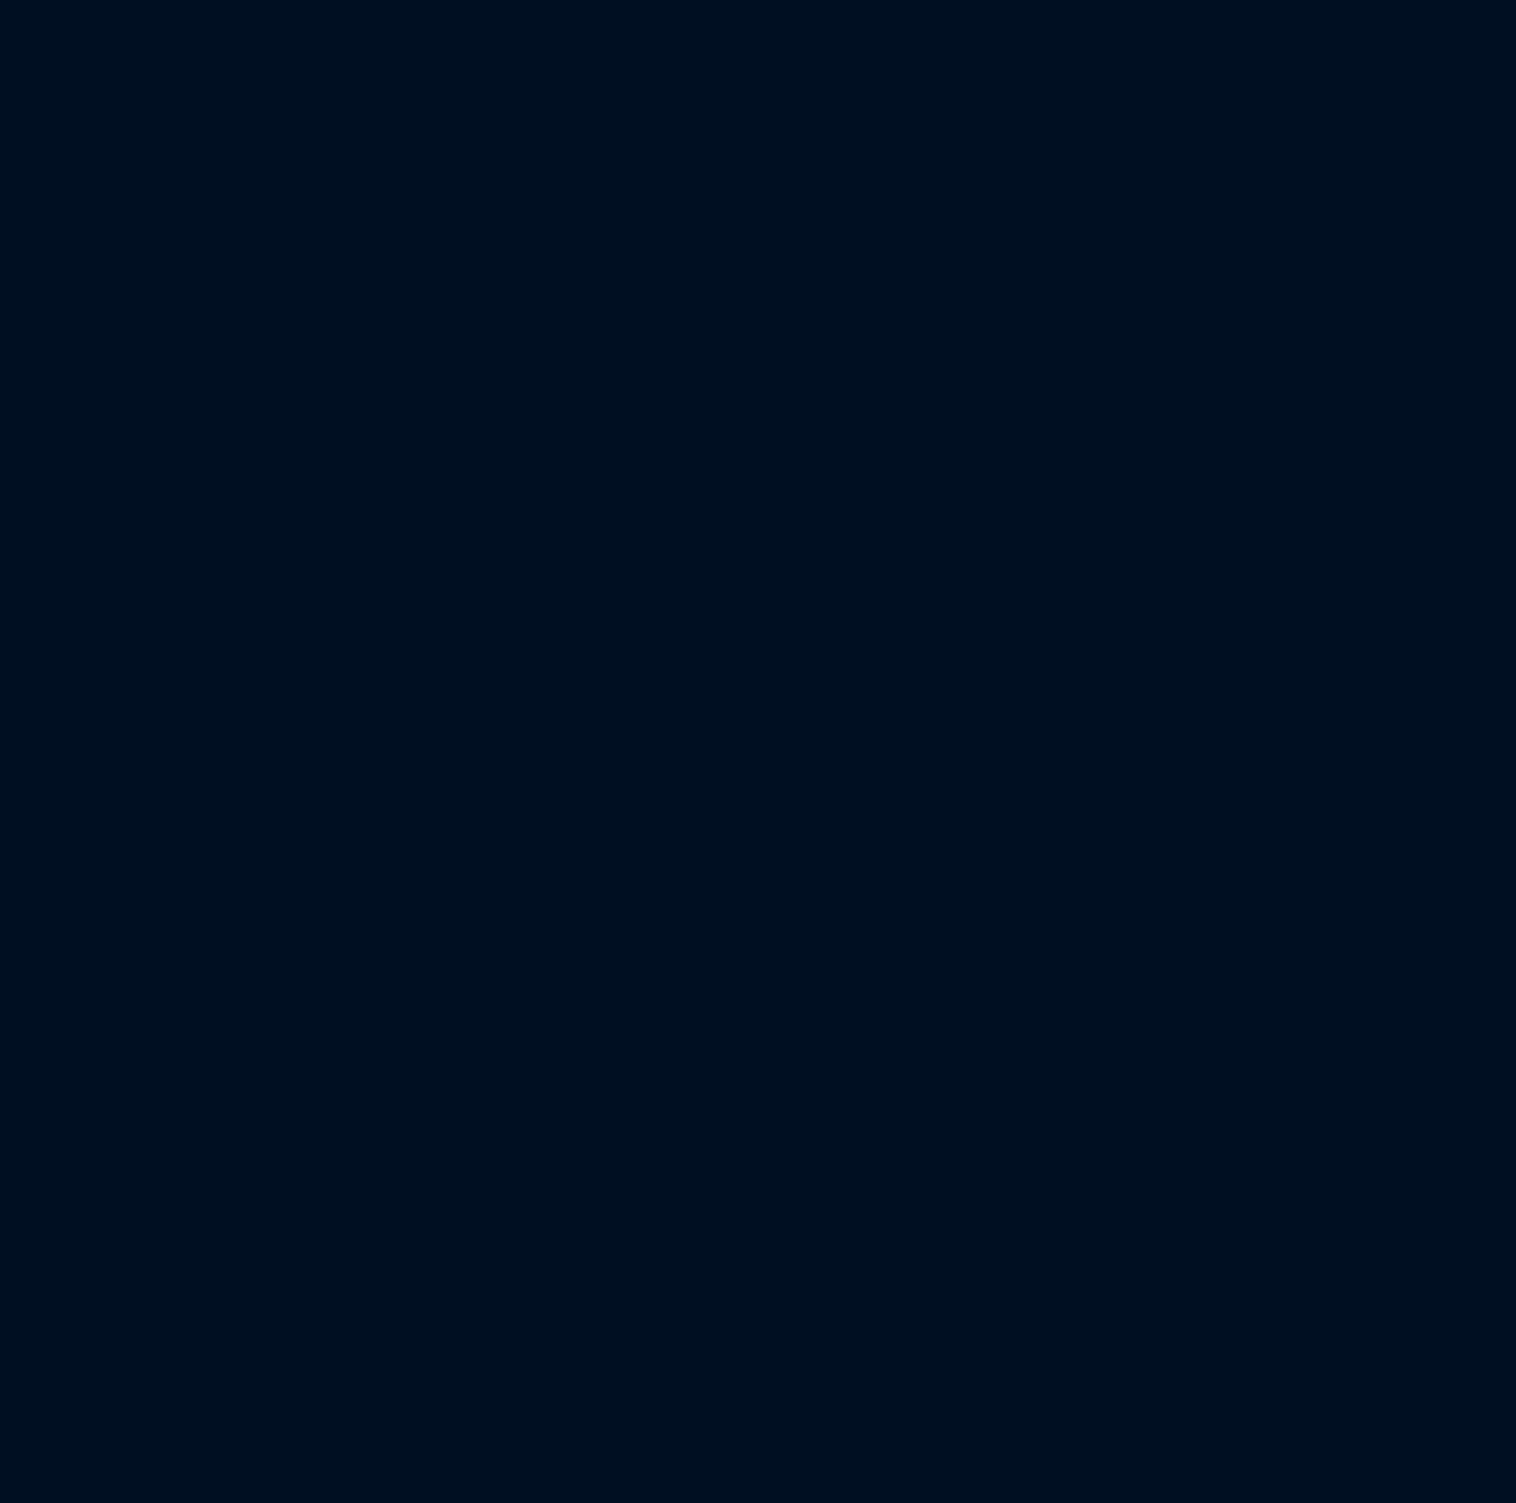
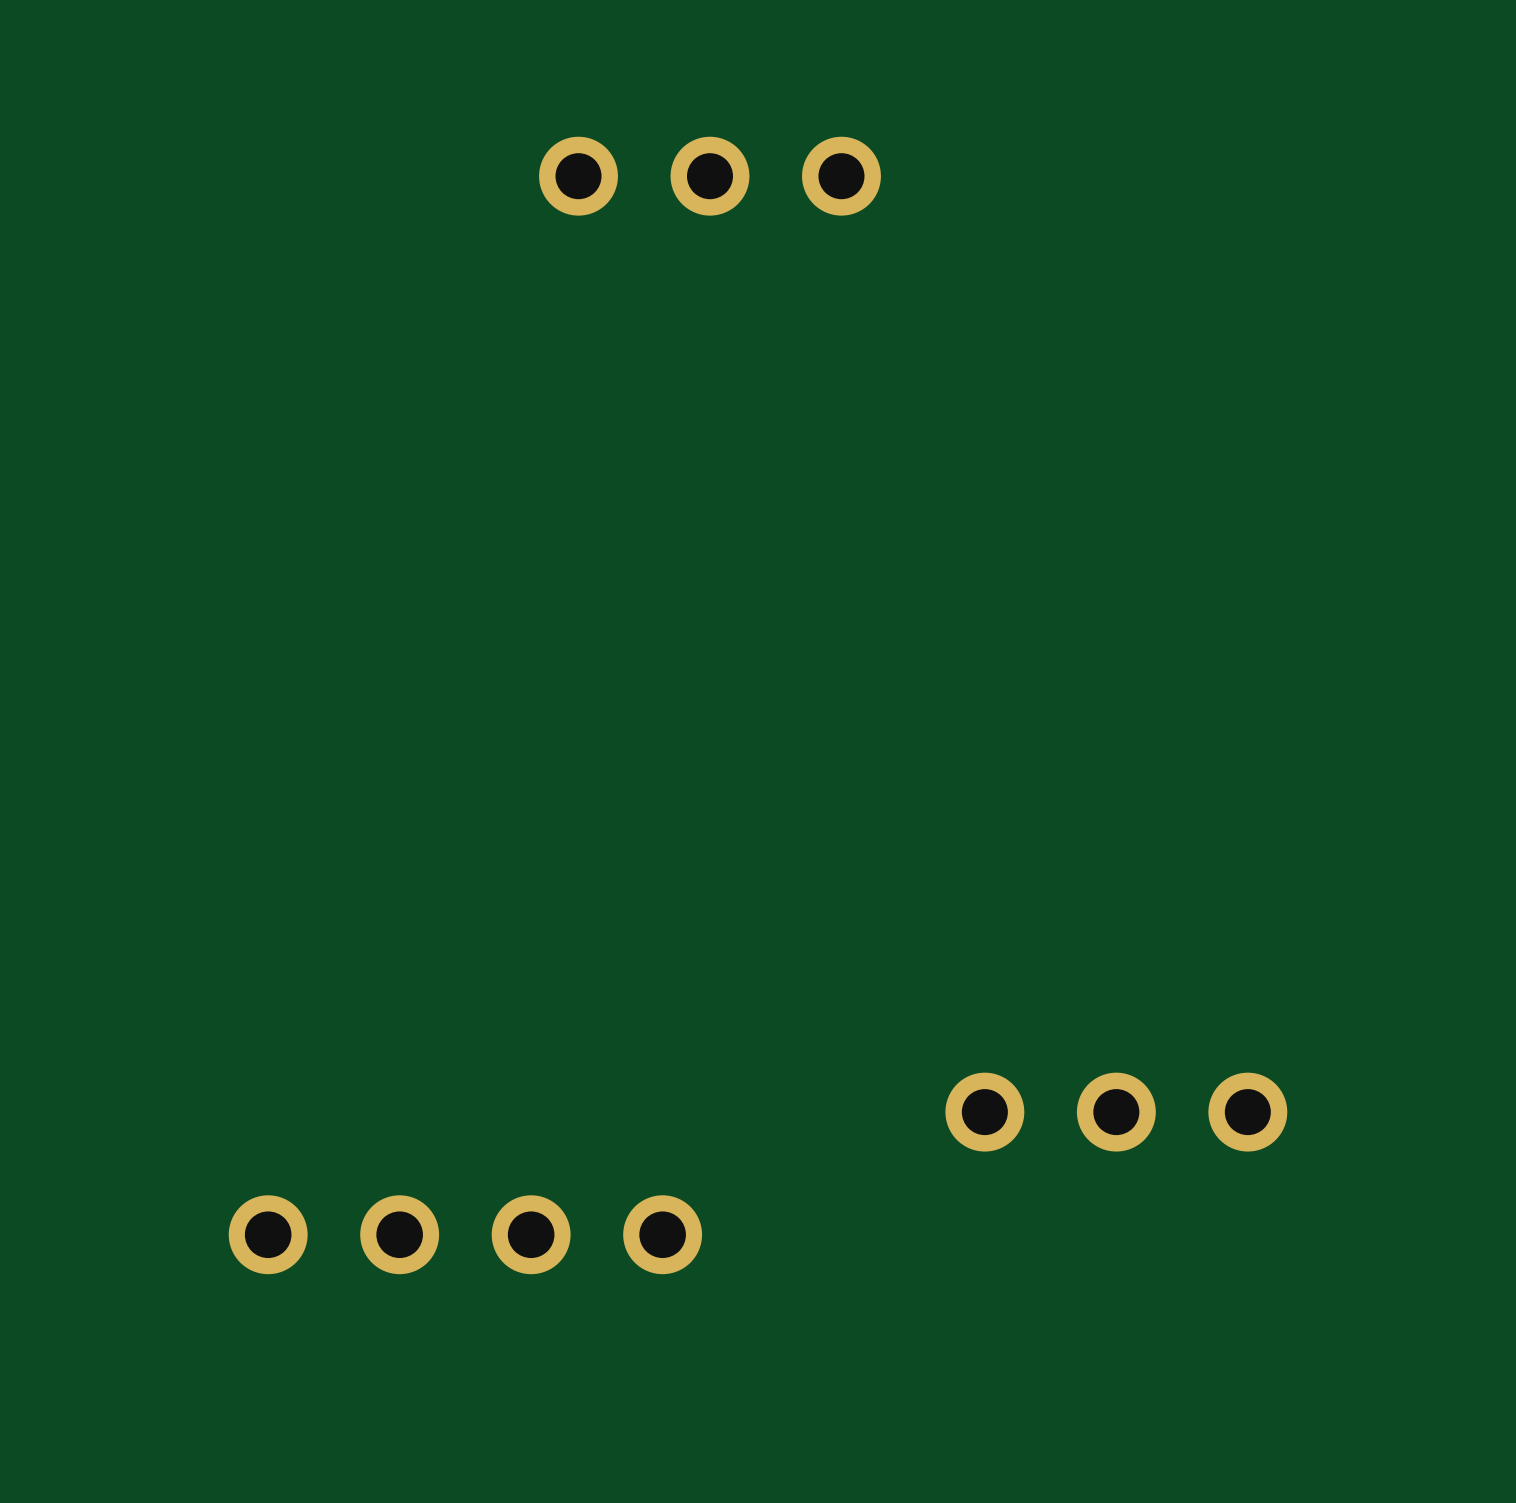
part: none -> (709, 176)
part: none -> (1116, 1112)
part: none -> (465, 1234)

